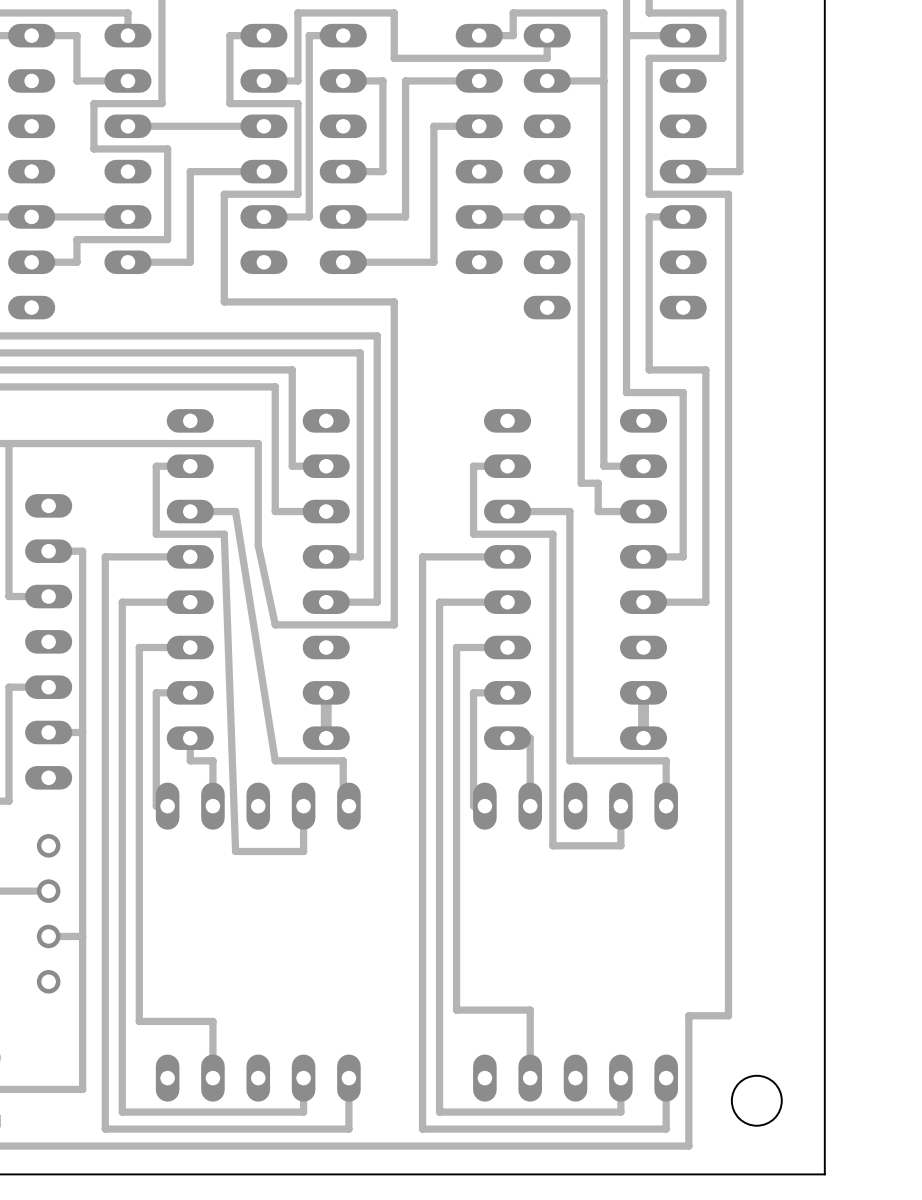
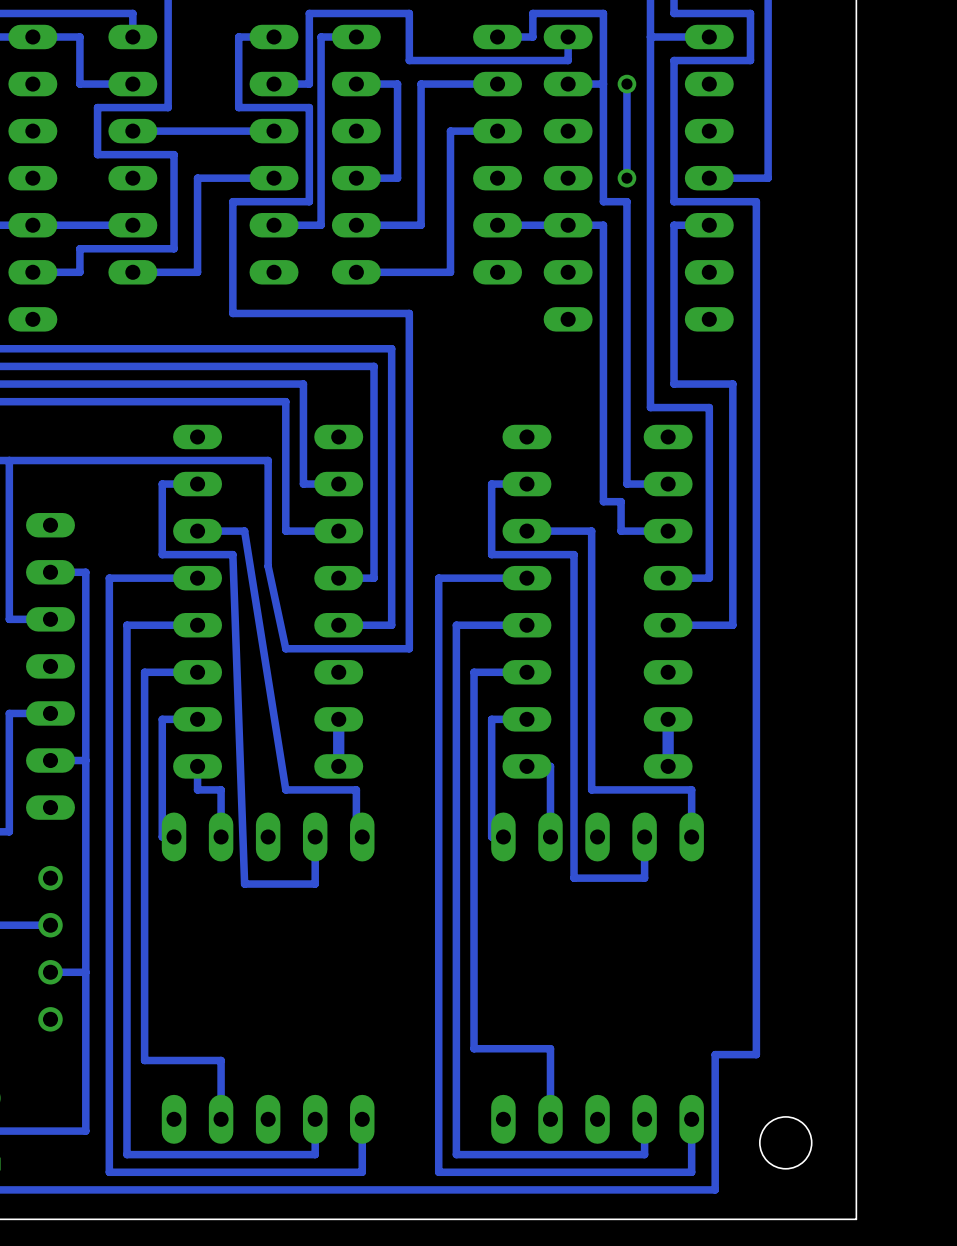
track: (581, 12) (603, 12) (603, 80) (581, 80) -> (603, 13) (603, 201) (626, 201)
via: none -> (626, 84)
track: (603, 171) (603, 194) -> none
via: none -> (626, 178)

